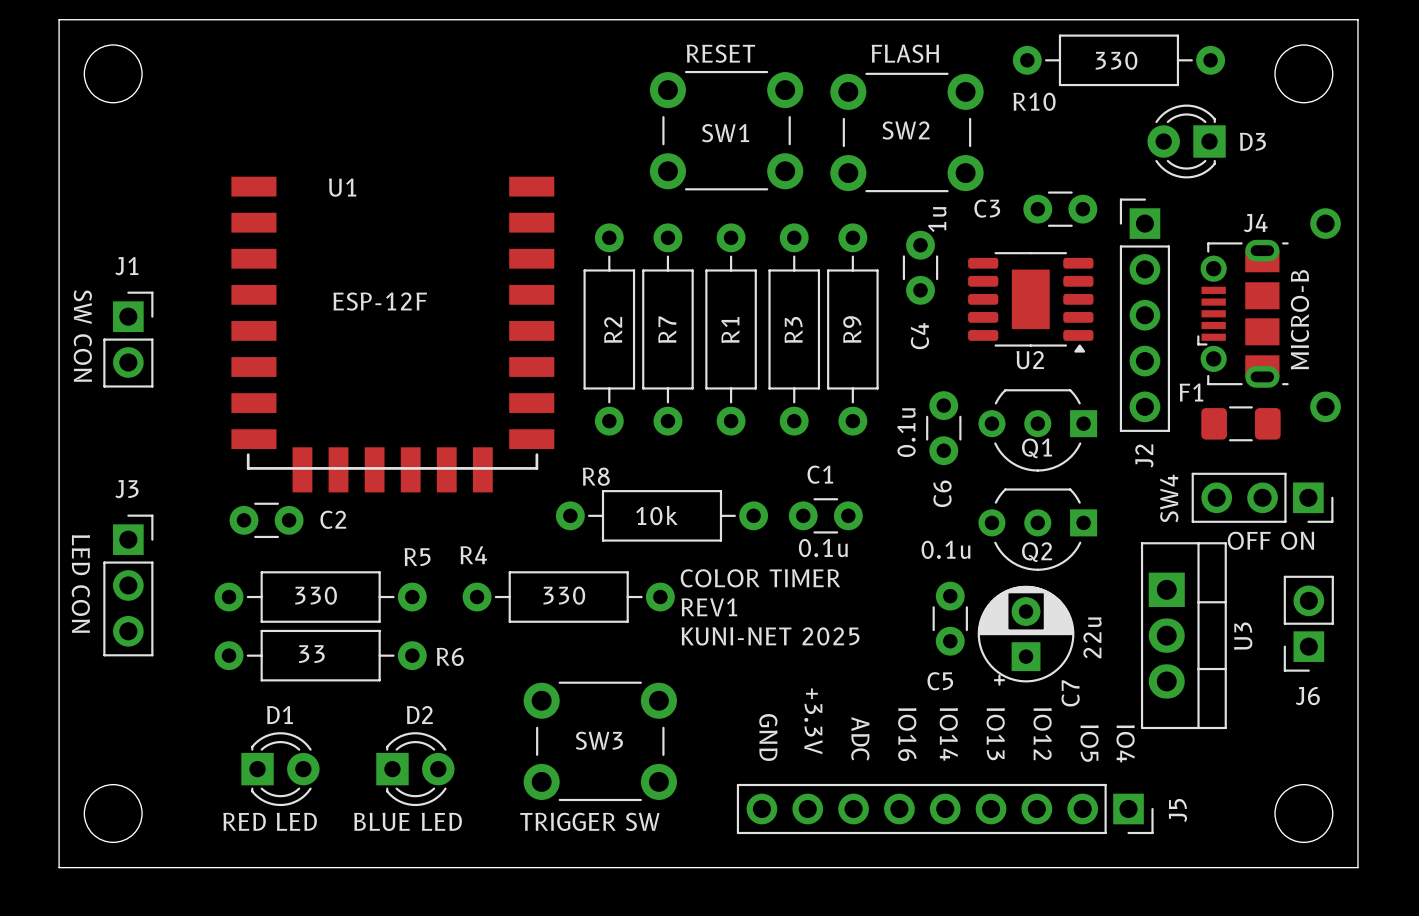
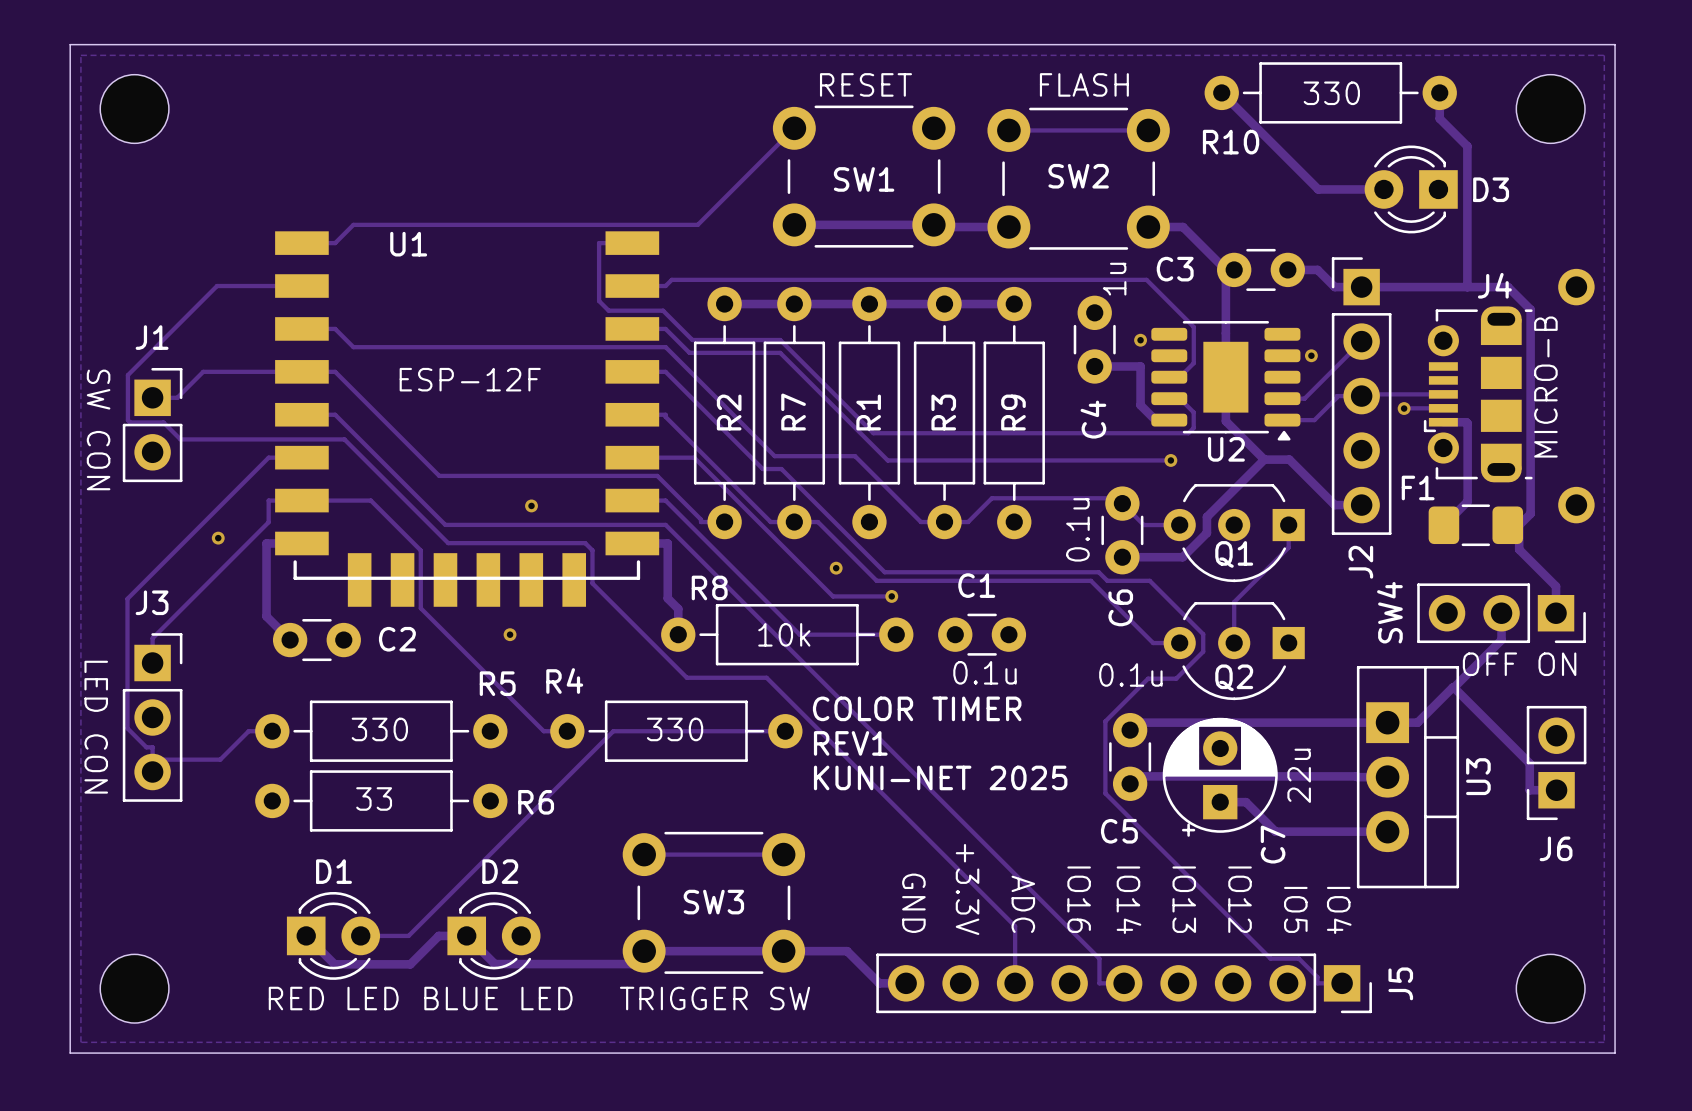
zone outline: none -> (80, 55) (1604, 55) (1604, 1042) (80, 1042) (80, 55)
track: none -> (1221, 92) (1318, 189) (1383, 189)
track: none -> (1439, 92) (1439, 118) (1467, 146) (1467, 287)
track: none -> (794, 128) (697, 224) (353, 224) (335, 243) (316, 243)
track: none -> (1008, 130) (1148, 130)
track: none -> (794, 224) (1008, 227)
track: none -> (1148, 227) (1182, 227) (1225, 269)
track: none -> (617, 243) (599, 243) (599, 301) (608, 310) (663, 310) (692, 340) (780, 340) (873, 433) (1188, 433) (1193, 428) (1193, 412) (1179, 398) (1169, 398)
track: none -> (1225, 269) (1225, 421) (1264, 459)
track: none -> (1287, 269) (1317, 269) (1334, 287) (1508, 287) (1530, 309) (1530, 513) (1519, 525)
track: none -> (316, 286) (217, 286) (127, 375) (127, 420) (130, 422) (163, 422) (180, 439) (344, 439) (448, 543) (585, 543) (592, 550) (592, 583) (686, 677) (766, 677) (1015, 926) (1015, 983)
track: none -> (617, 286) (665, 286) (671, 279) (1146, 279) (1193, 327) (1193, 363) (1179, 377) (1169, 377)
track: none -> (724, 304) (1014, 304)
track: none -> (316, 328) (335, 328) (353, 347) (665, 347) (774, 456) (855, 456) (920, 522) (968, 522) (991, 498) (1117, 498) (1143, 525) (1179, 525)
track: none -> (617, 328) (665, 328) (689, 352) (780, 352) (887, 460) (1170, 460)
via: none -> (1140, 340)
track: none -> (1355, 347) (1304, 398) (1272, 398)
via: none -> (1311, 355)
track: none -> (1094, 366) (1140, 366) (1140, 405) (1155, 420) (1169, 420)
track: none -> (617, 371) (665, 371) (762, 469) (781, 469) (884, 572) (1098, 572) (1107, 580) (1149, 580) (1203, 634) (1203, 651) (1176, 678) (1148, 678) (1105, 721) (1105, 793) (1270, 958) (1298, 958) (1317, 977) (1317, 983) (1342, 983)
track: none -> (1367, 390) (1372, 394) (1443, 394)
track: none -> (1361, 396) (1336, 396) (1314, 420) (1282, 420)
track: none -> (152, 397) (177, 397) (203, 371) (335, 371) (439, 475) (657, 475) (701, 519) (701, 522) (724, 522)
track: none -> (1404, 408) (1443, 408)
via: none -> (1404, 408)
track: none -> (316, 414) (335, 414) (445, 524) (665, 524) (1099, 958) (1099, 983) (1124, 983)
track: none -> (617, 414) (665, 414) (665, 416) (770, 522) (817, 522) (876, 580) (1090, 580) (1153, 643) (1179, 643)
track: none -> (1443, 422) (1467, 423) (1467, 501) (1443, 525)
track: none -> (316, 457) (268, 457) (127, 598) (127, 728) (146, 747) (152, 747) (152, 772)
track: none -> (617, 457) (694, 457) (833, 596) (891, 596)
track: none -> (1264, 459) (1206, 516) (1206, 533) (1182, 557) (1122, 557)
track: none -> (1264, 459) (1289, 459) (1334, 505) (1361, 505)
via: none -> (1170, 460)
track: none -> (617, 500) (665, 500) (799, 634) (896, 634)
via: none -> (531, 505)
track: none -> (1288, 525) (1288, 547) (1234, 602) (1234, 643)
track: none -> (1519, 525) (1519, 549) (1556, 586) (1556, 613)
via: none -> (218, 538)
track: none -> (316, 543) (266, 543) (266, 616) (290, 640)
track: none -> (617, 543) (667, 543) (667, 598) (678, 608) (678, 634)
via: none -> (836, 568)
via: none -> (891, 596)
track: none -> (1501, 613) (1501, 640) (1453, 687)
via: none -> (510, 634)
track: none -> (152, 663) (152, 638) (268, 522) (268, 500) (370, 500) (420, 550) (420, 608) (543, 731) (567, 731)
track: none -> (1453, 687) (1417, 722) (1137, 722) (1130, 730)
track: none -> (1453, 687) (1529, 763) (1529, 790) (1556, 790)
track: none -> (272, 731) (248, 731) (220, 759) (152, 759)
track: none -> (785, 731) (613, 731) (408, 935) (360, 935)
track: none -> (1387, 777) (1137, 776) (1130, 783)
track: none -> (1220, 802) (1245, 802) (1275, 831) (1387, 831)
track: none -> (644, 854) (783, 854)
track: none -> (306, 935) (334, 964) (410, 964) (438, 935) (466, 935) (494, 964) (631, 964) (644, 951) (847, 951) (879, 983) (906, 983)

